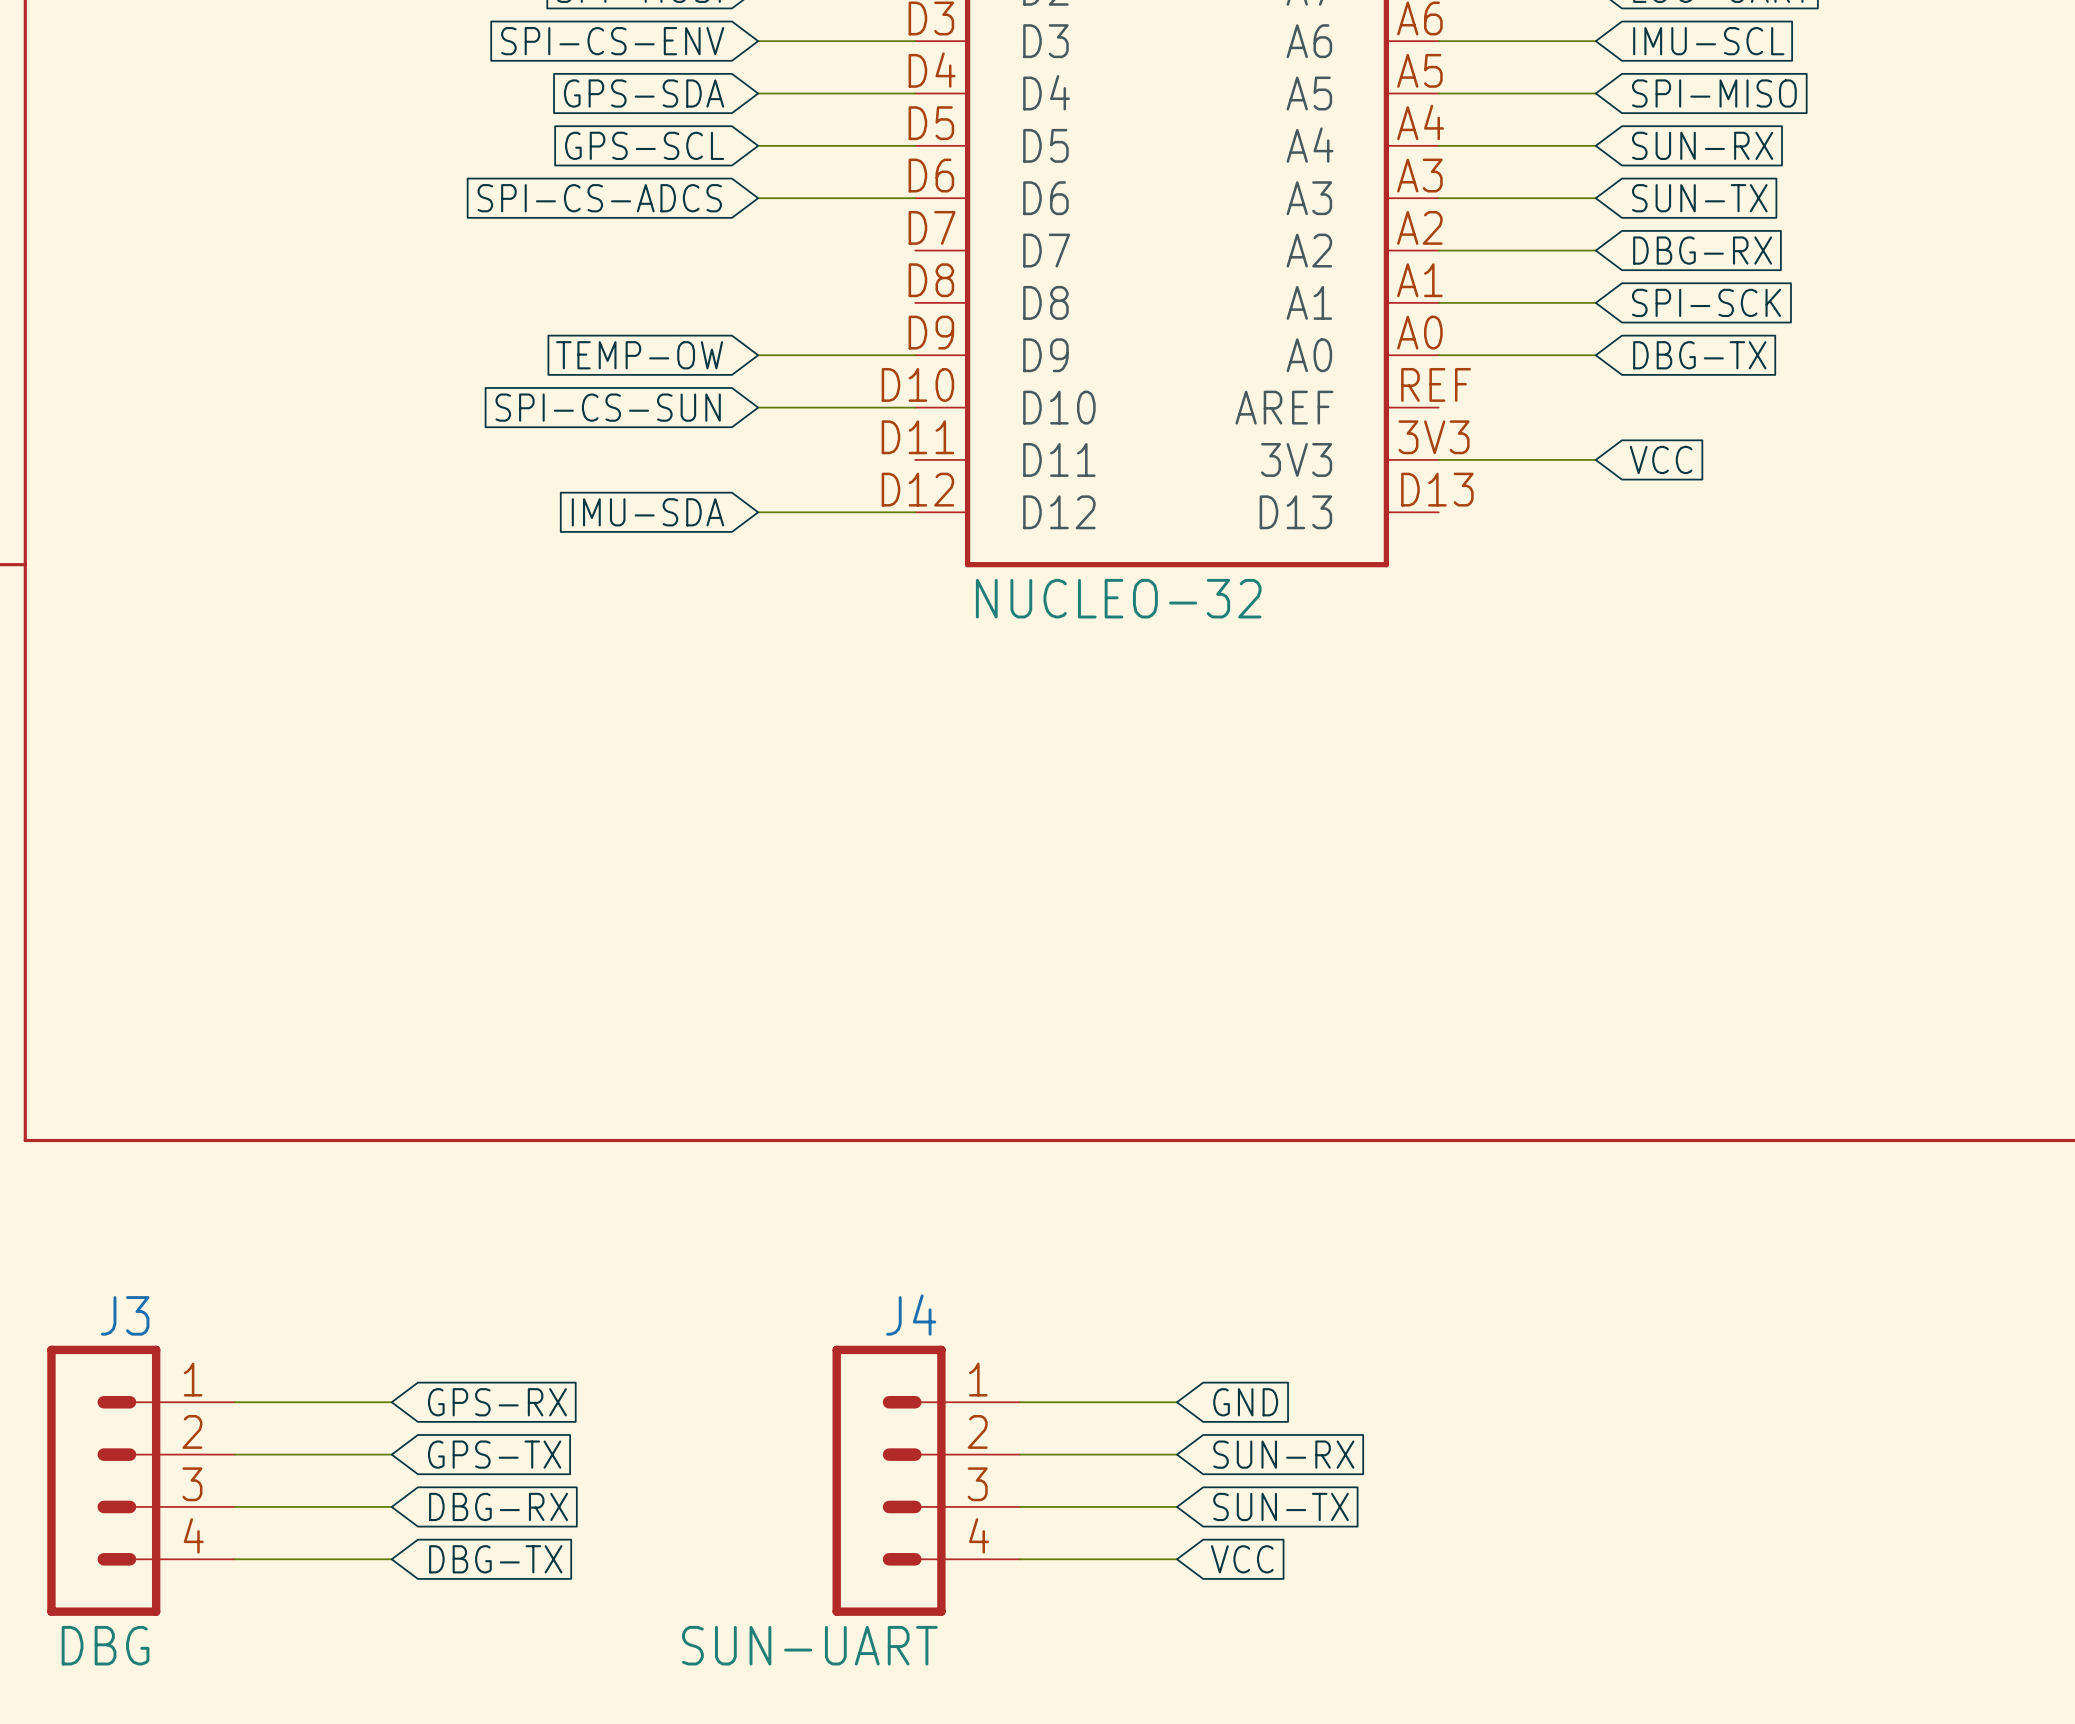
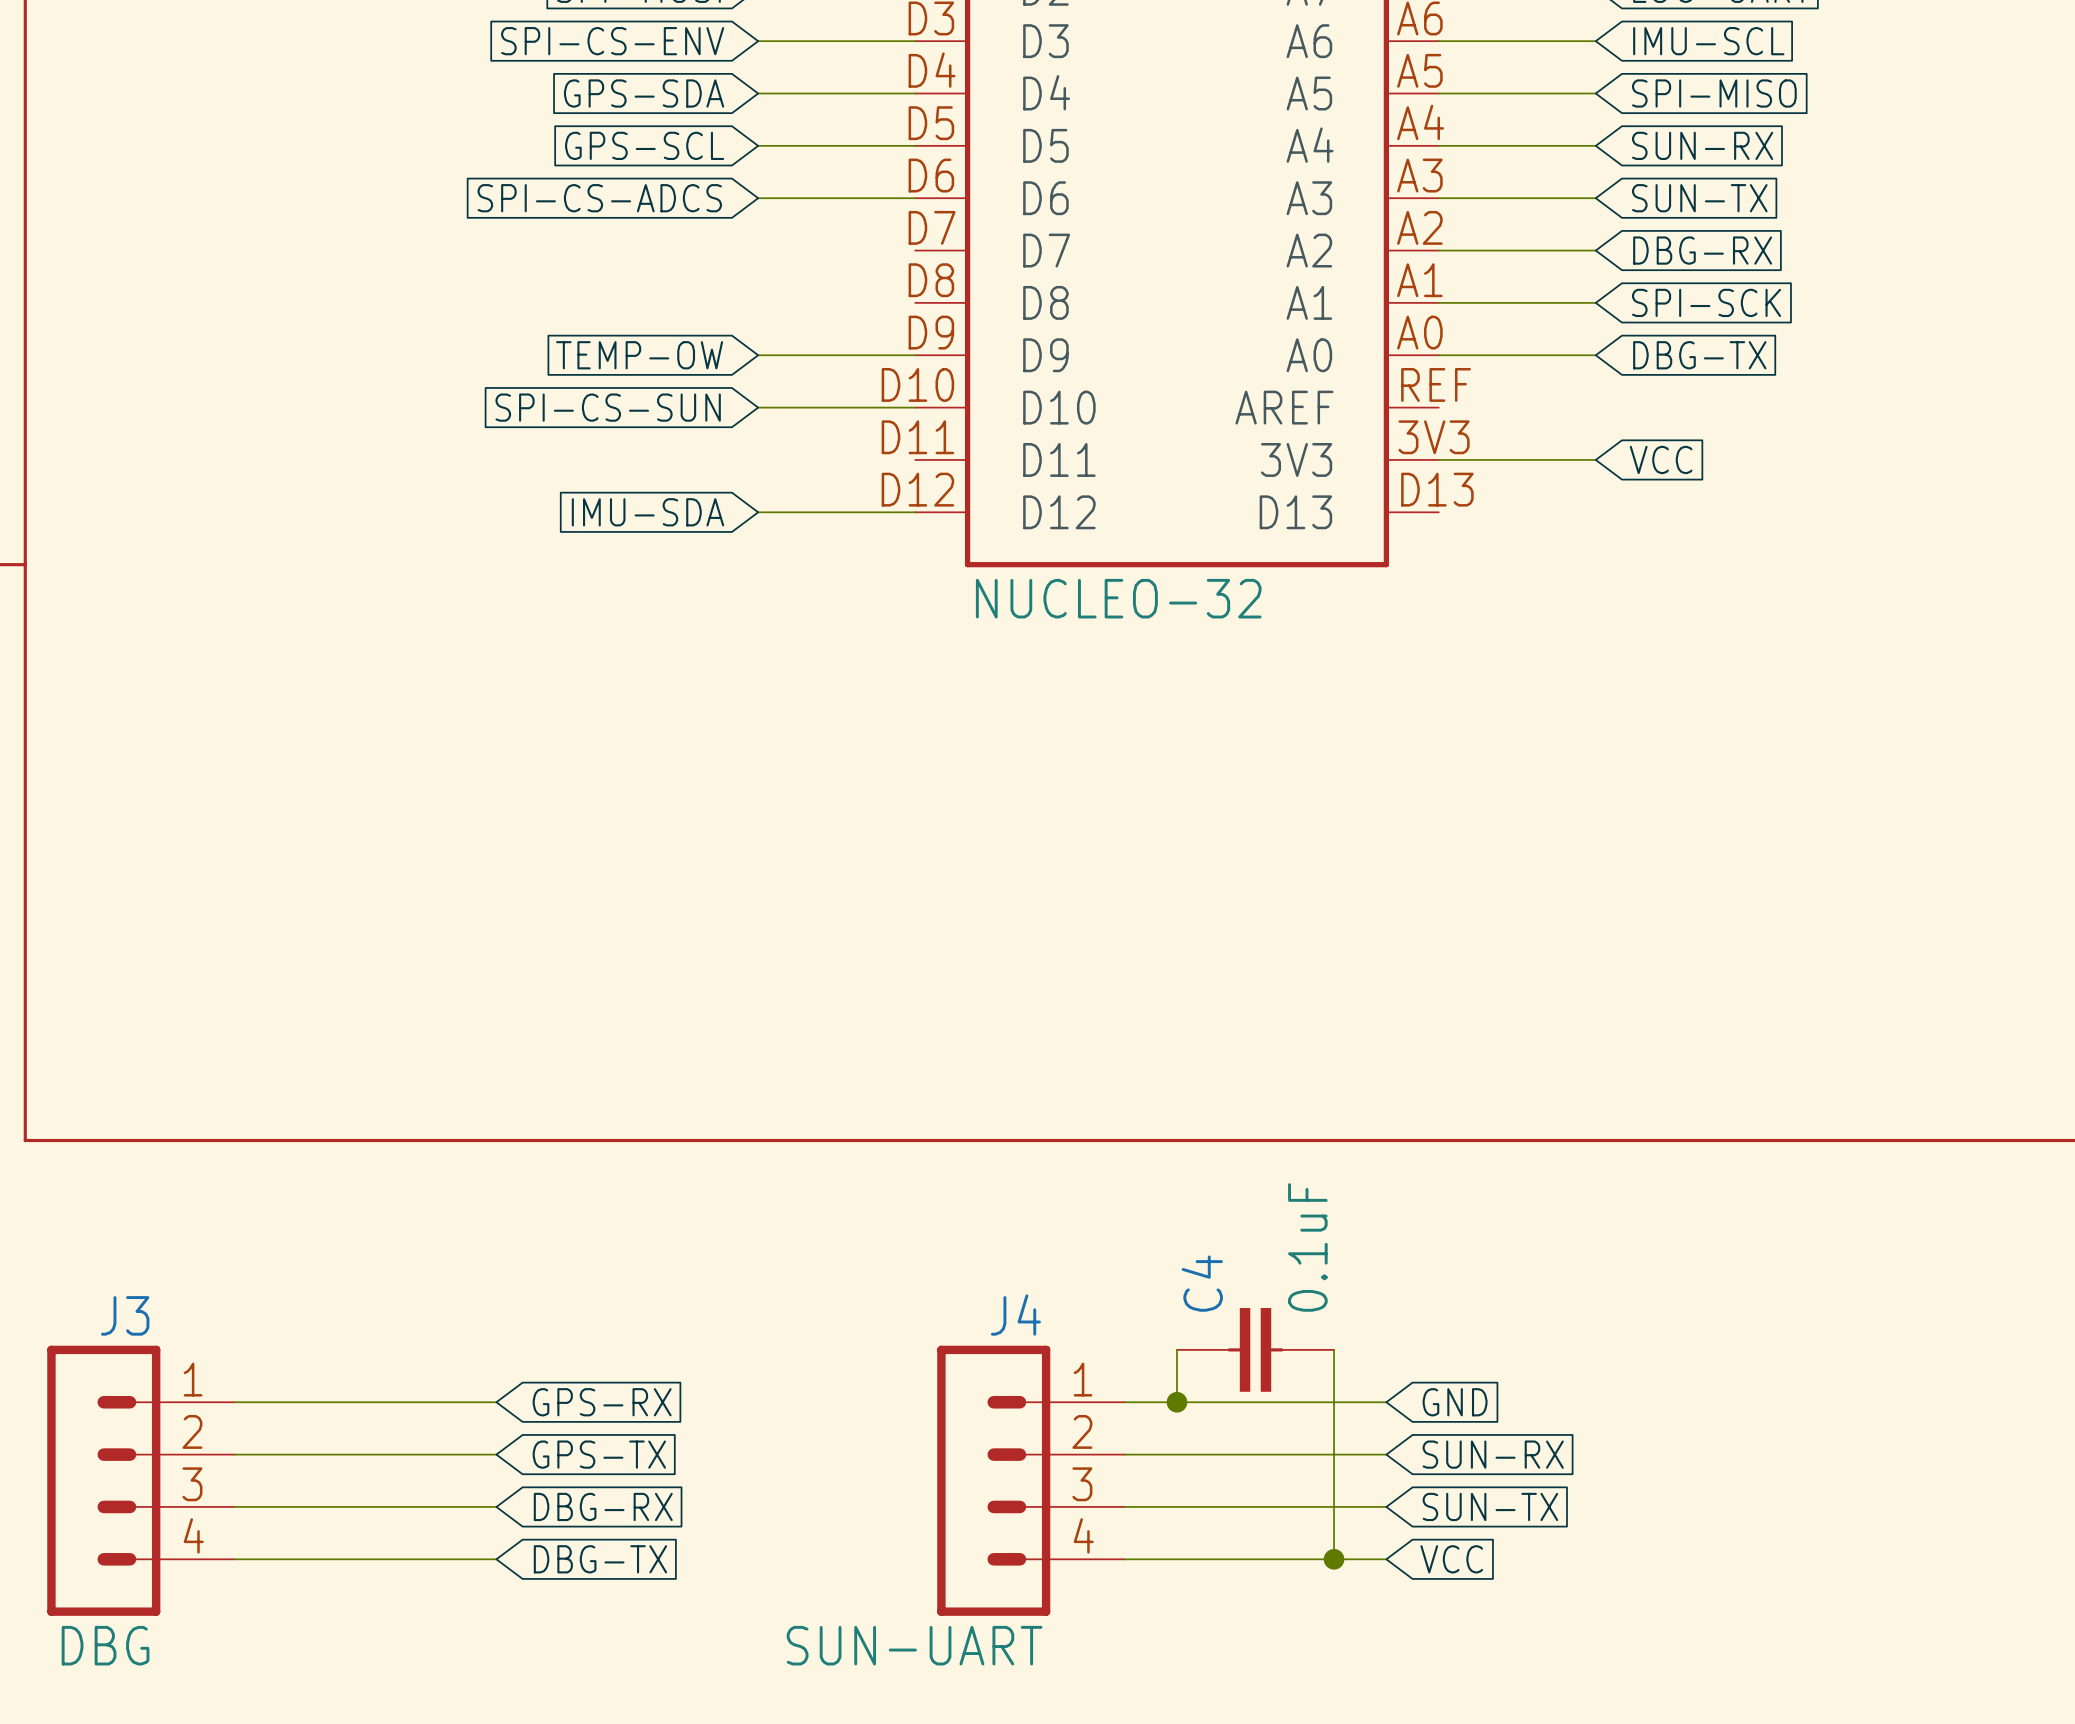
wire: none -> (1176, 1349) (1176, 1402) (1386, 1402)
C4: none -> 0.1uF (1255, 1349)
wire: none -> (1334, 1349) (1334, 1559)
wire: none -> (391, 1402) (496, 1402)
global label position: GPS-RX (497, 1402) -> GPS-RX (602, 1402)
junction: none -> (1176, 1402)
global label position: GND (1245, 1402) -> GND (1455, 1402)
wire: none -> (391, 1454) (496, 1454)
global label position: GPS-TX (494, 1454) -> GPS-TX (599, 1454)
wire: none -> (1176, 1454) (1386, 1454)
global label position: SUN-RX (1283, 1454) -> SUN-RX (1493, 1454)
J4 position: (926, 1480) -> (1030, 1480)
wire: none -> (391, 1506) (496, 1506)
global label position: DBG-RX (498, 1506) -> DBG-RX (603, 1506)
wire: none -> (1176, 1506) (1386, 1506)
global label position: SUN-TX (1281, 1506) -> SUN-TX (1490, 1506)
wire: none -> (391, 1559) (496, 1559)
global label position: DBG-TX (495, 1559) -> DBG-TX (600, 1559)
wire: none -> (1176, 1559) (1386, 1559)
global label position: VCC (1242, 1559) -> VCC (1451, 1559)
junction: none -> (1334, 1559)

